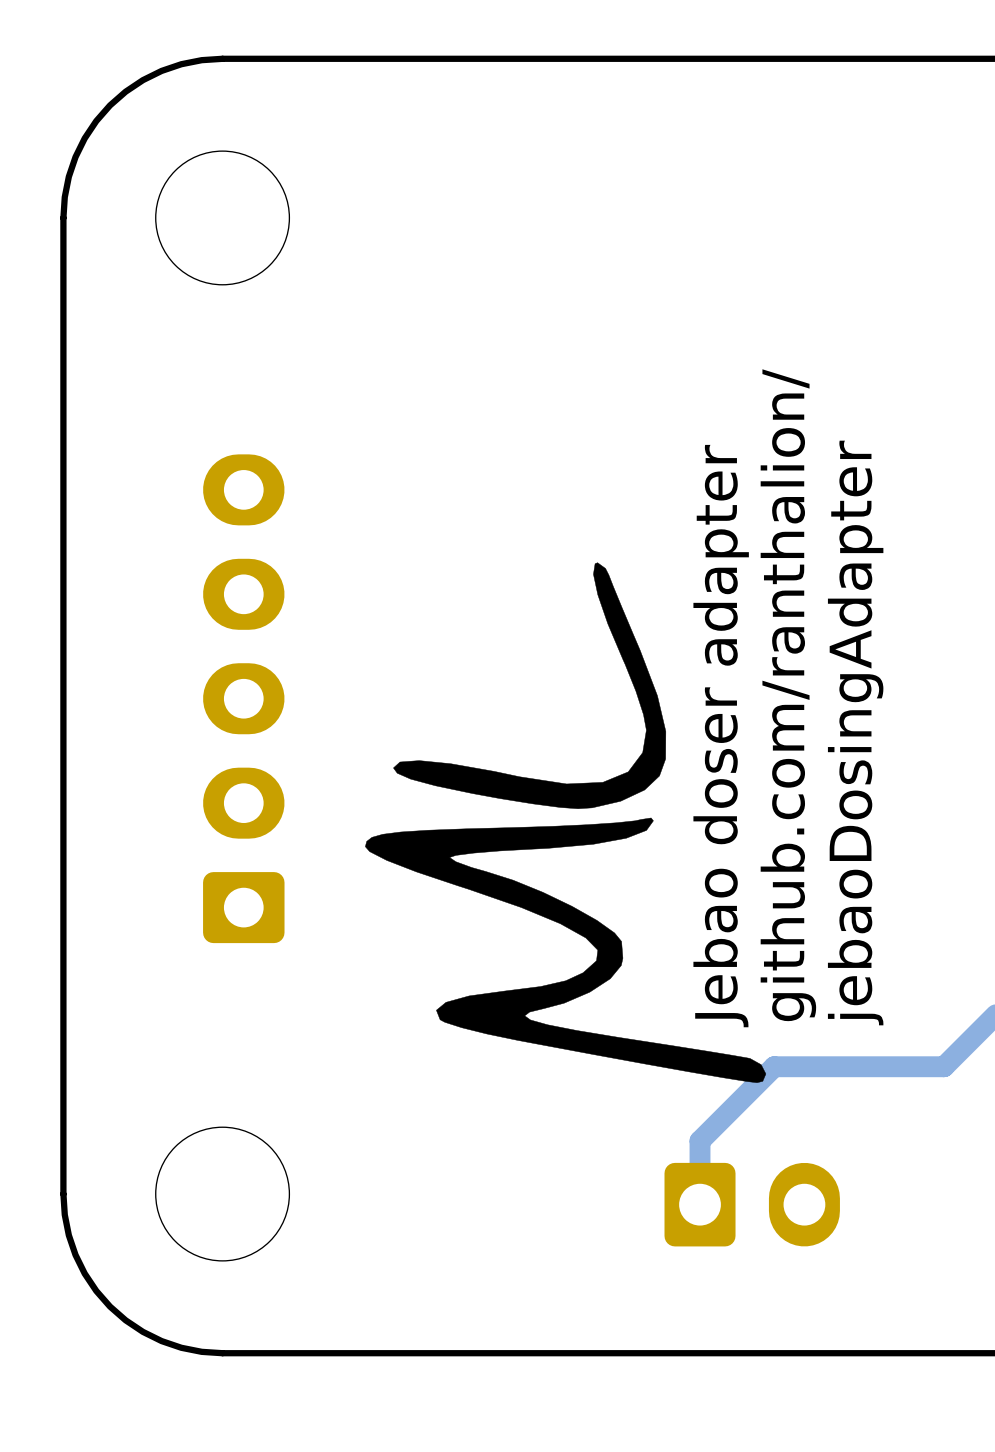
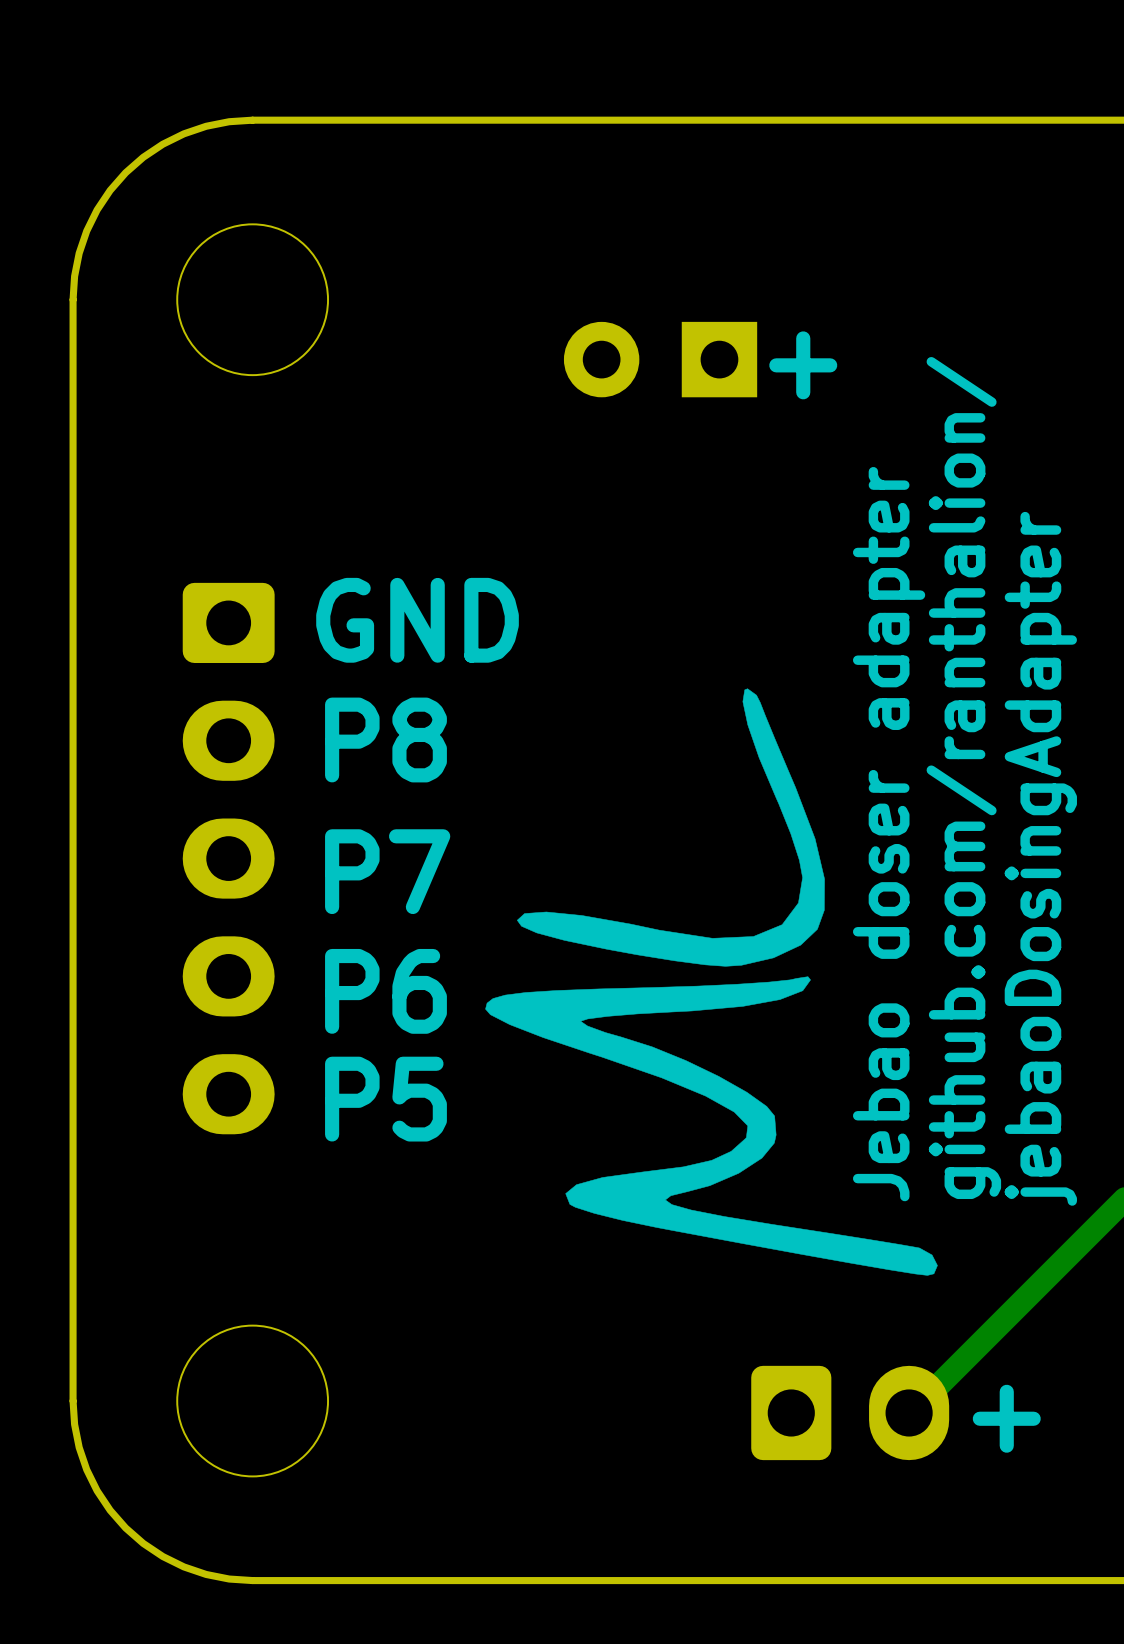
part: none -> (660, 359)
text: none -> + (803, 365)
text: none -> GND (417, 620)
text: none -> P8 (385, 739)
text: github.com/ranthalion/ (788, 695) -> Jebao doser adapter (889, 834)
part rotation: 0° (243, 698) -> 180° (228, 858)
text: none -> P7 (387, 871)
text: jebaoDosingAdapter (855, 733) -> github.com/ranthalion/ (963, 778)
text: none -> jebaoDosingAdapter (1040, 858)
text: Jebao doser adapter (721, 736) -> none
drawing position: (565, 822) -> (711, 982)
text: none -> P6 (385, 991)
text: none -> P5 (385, 1099)
track: (944, 1066) (774, 1066) (700, 1141) (700, 1204) -> (1066, 1257) (909, 1412)
text: none -> + (1006, 1418)

